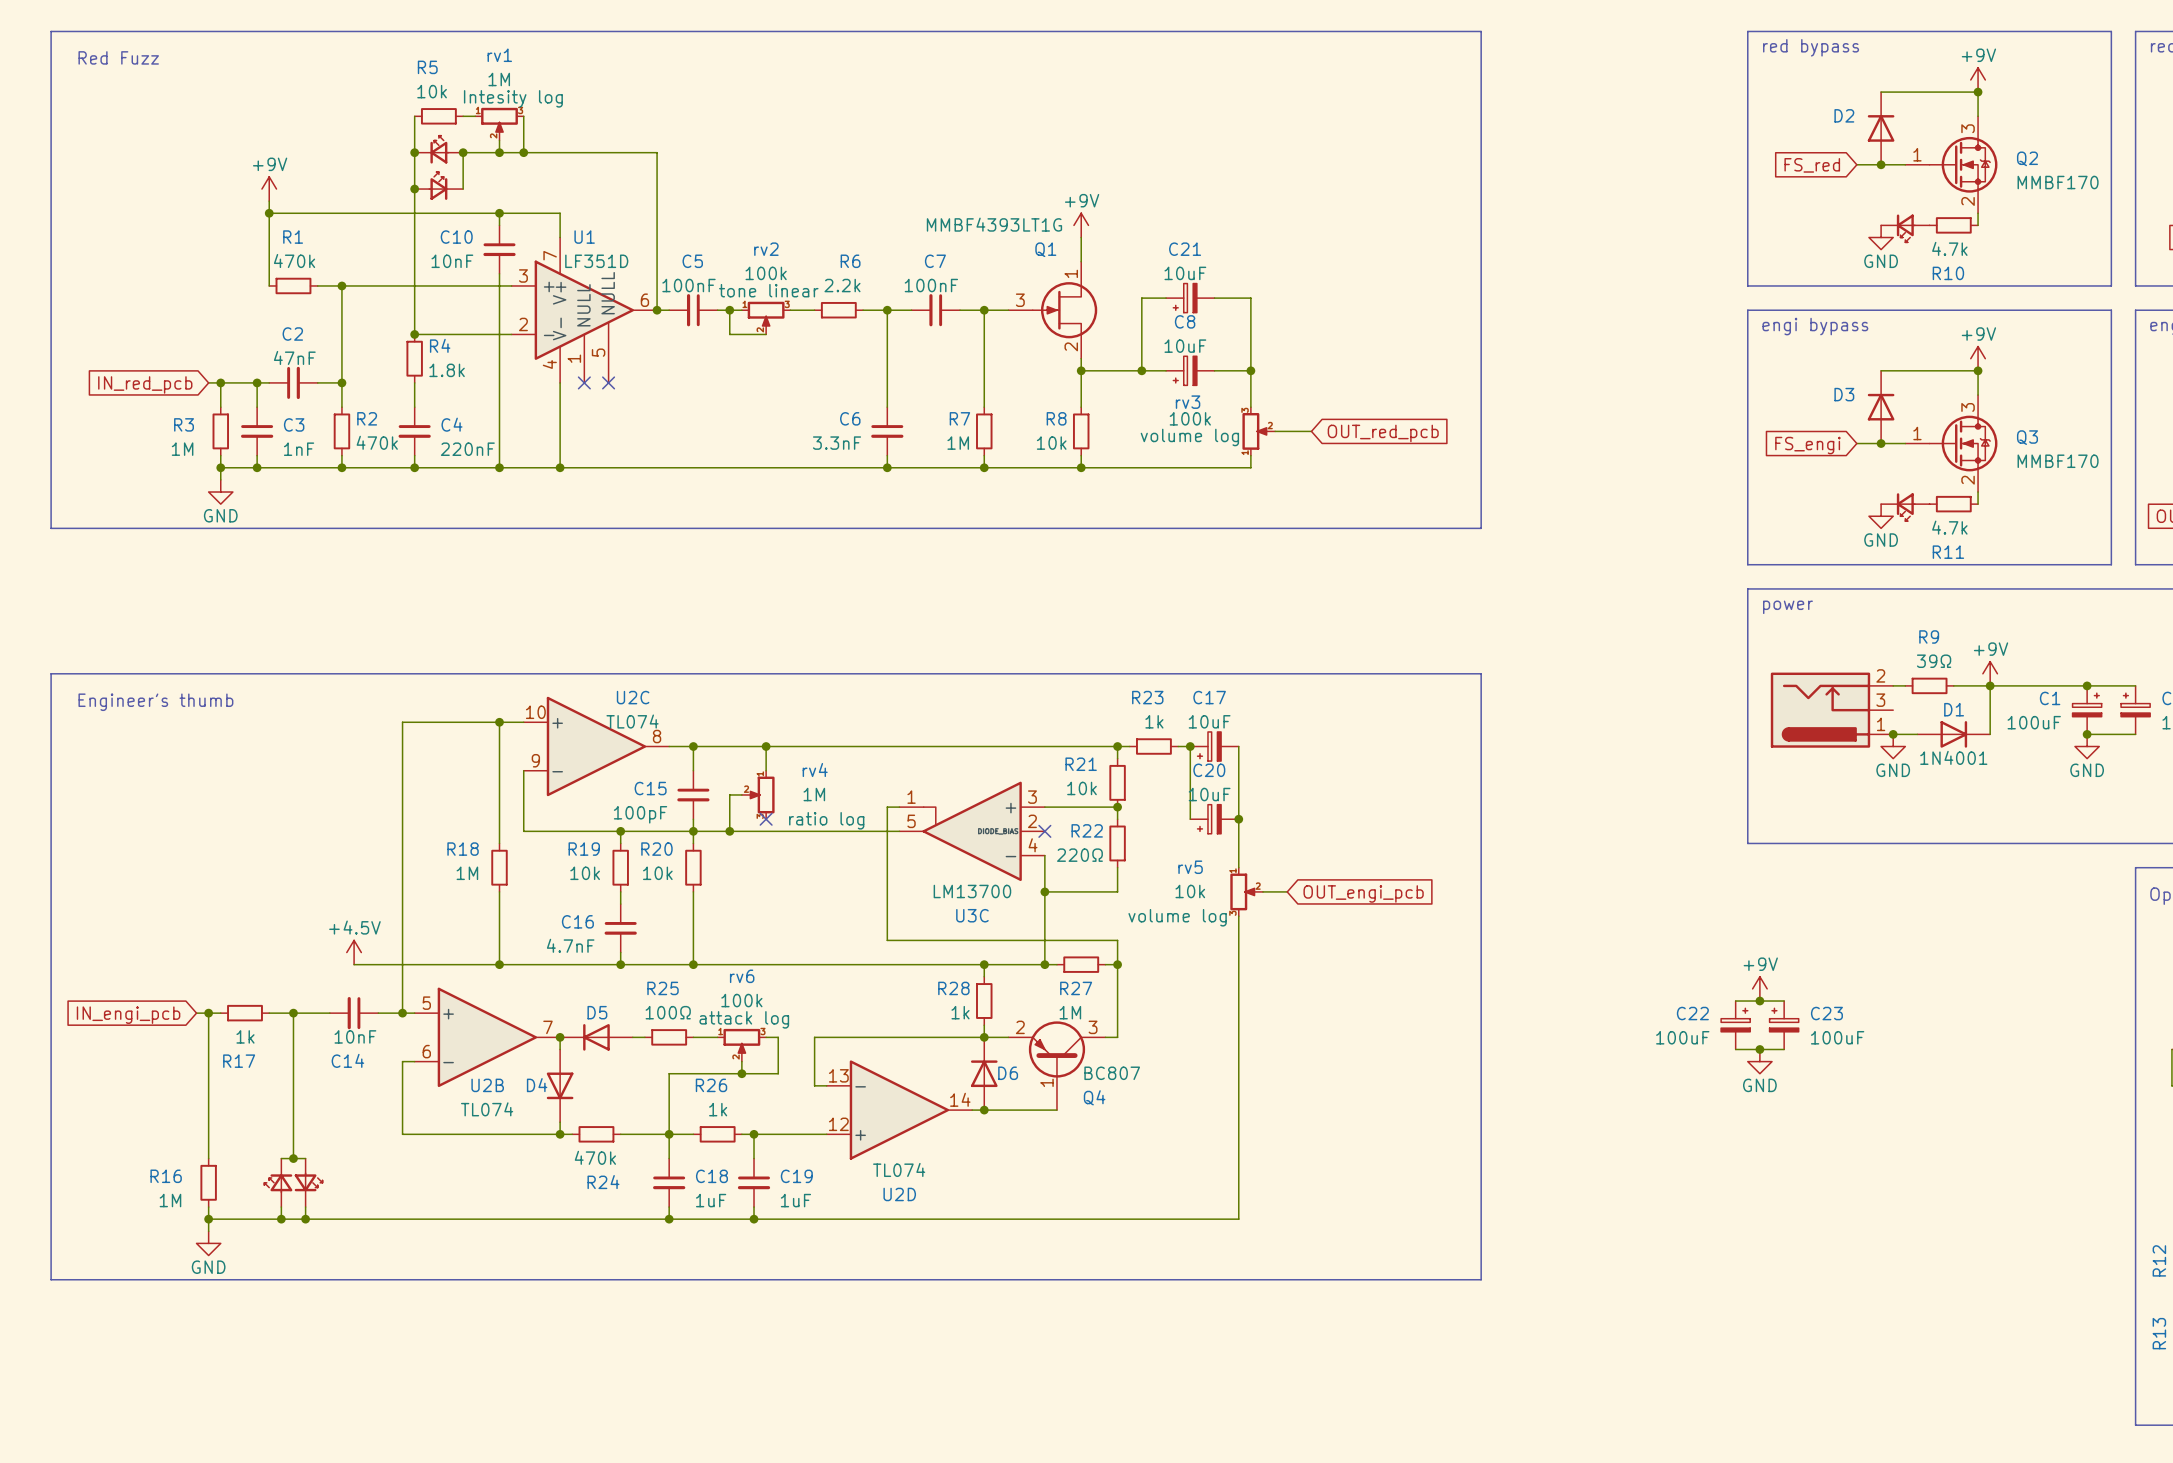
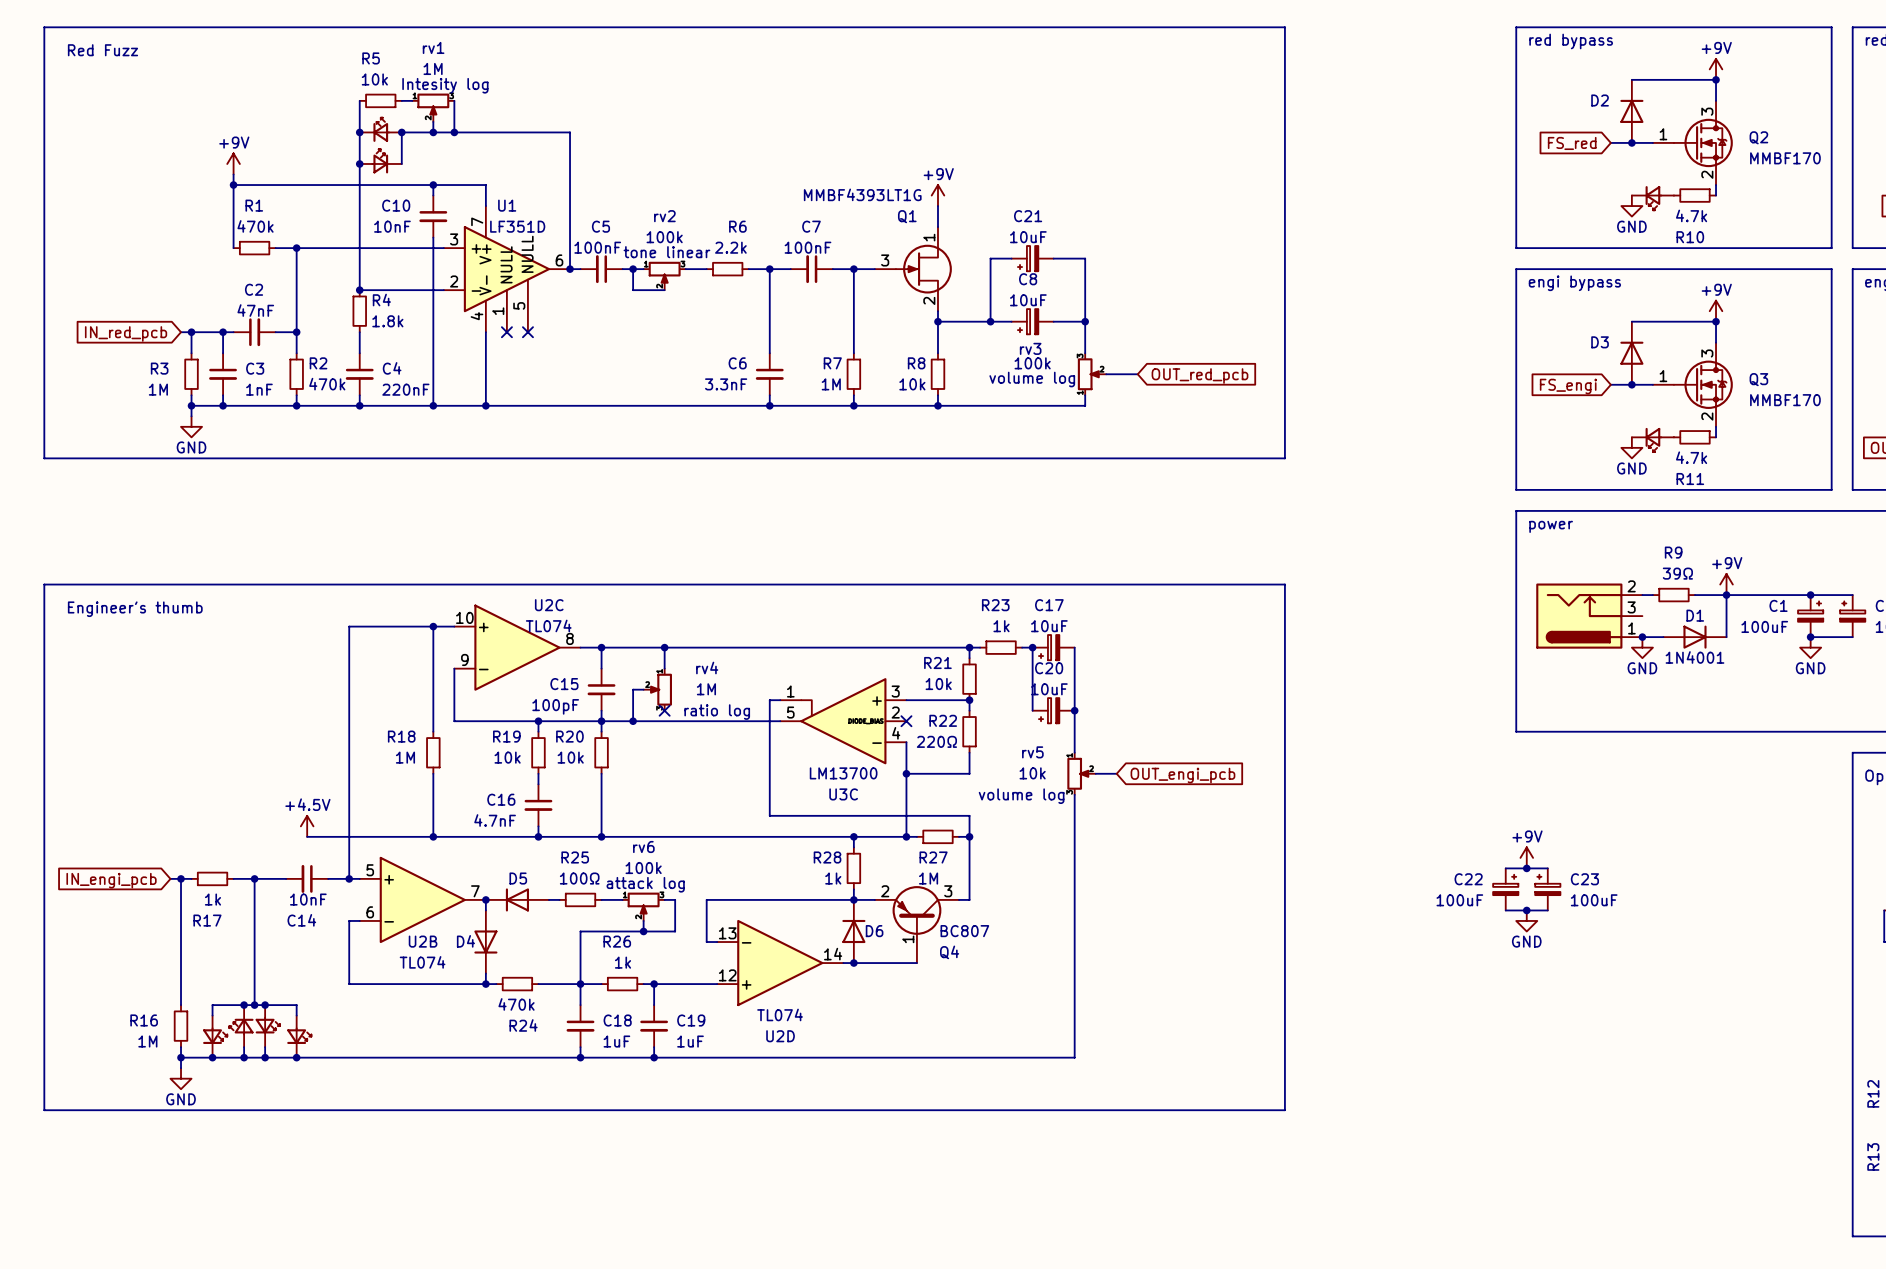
wire: none -> (244, 1005) (212, 1005) (212, 1015)
junction: none -> (244, 1005)
wire: none -> (265, 1005) (296, 1005) (296, 1015)
junction: none -> (265, 1005)
part: none -> (215, 1036)
part: none -> (299, 1036)
junction: none -> (212, 1057)
junction: none -> (296, 1057)

